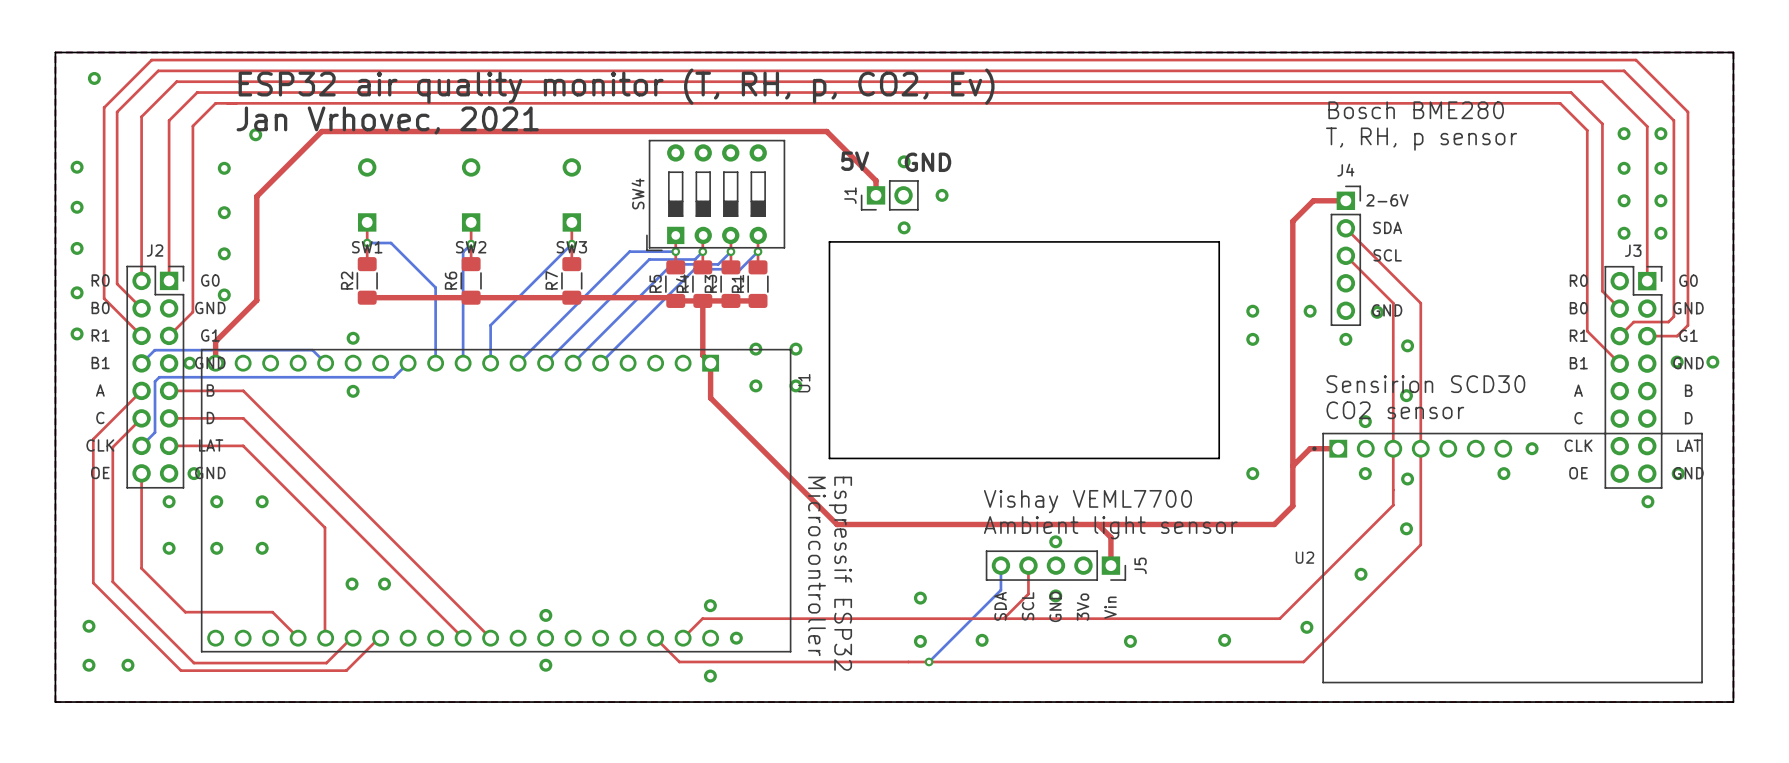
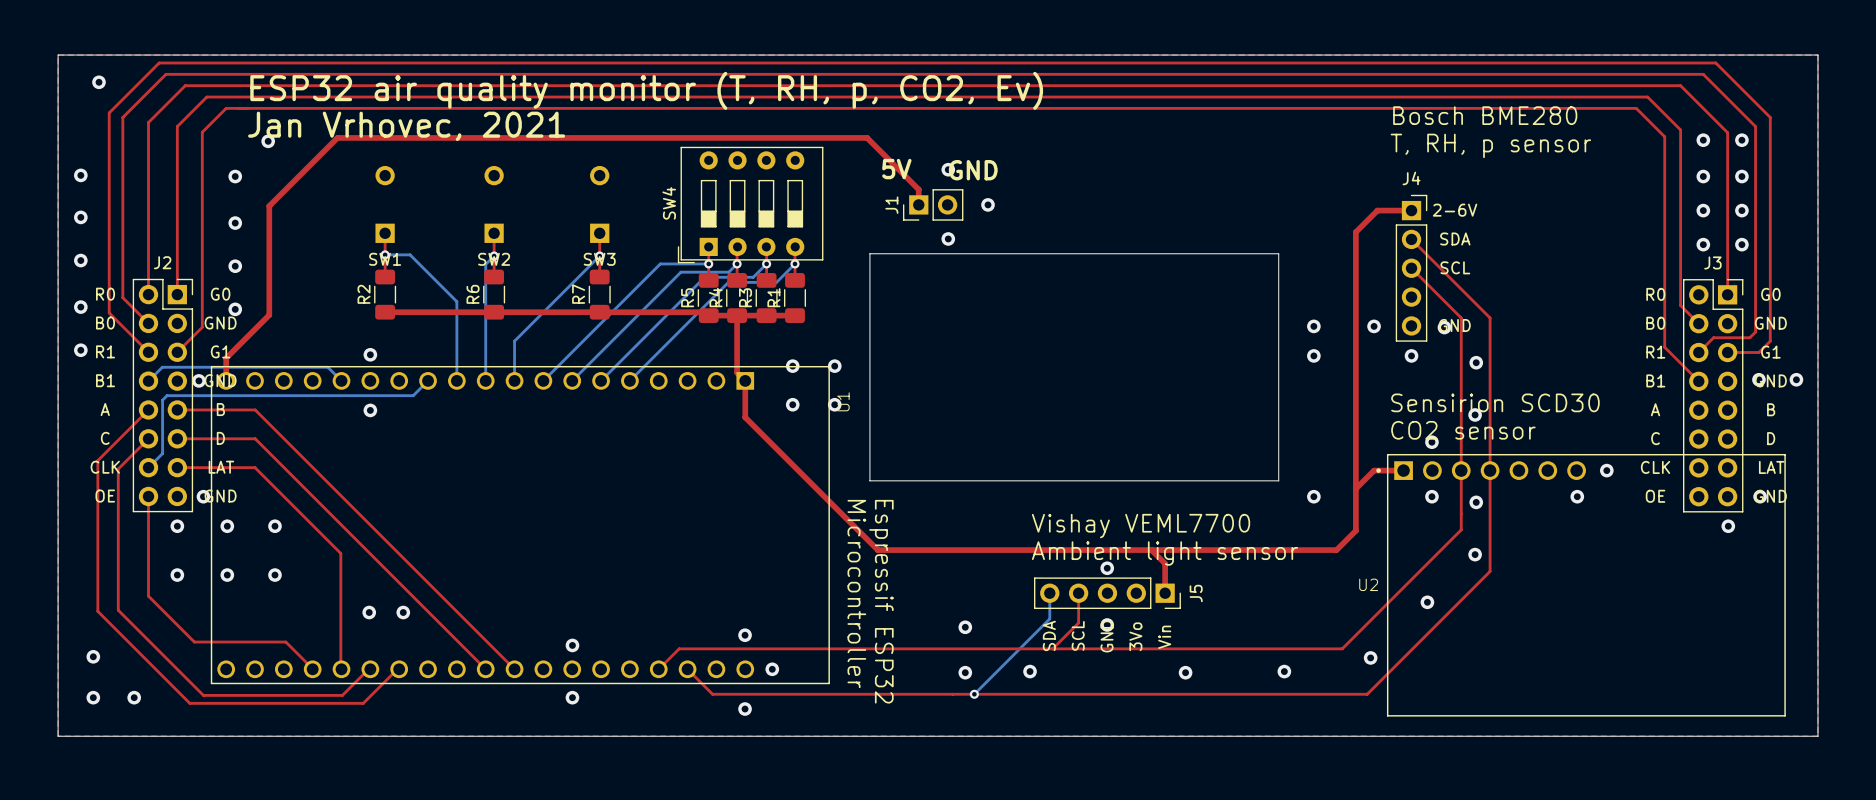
top track: (702, 618) (683, 638) -> (736, 648) (679, 648) (658, 669)

